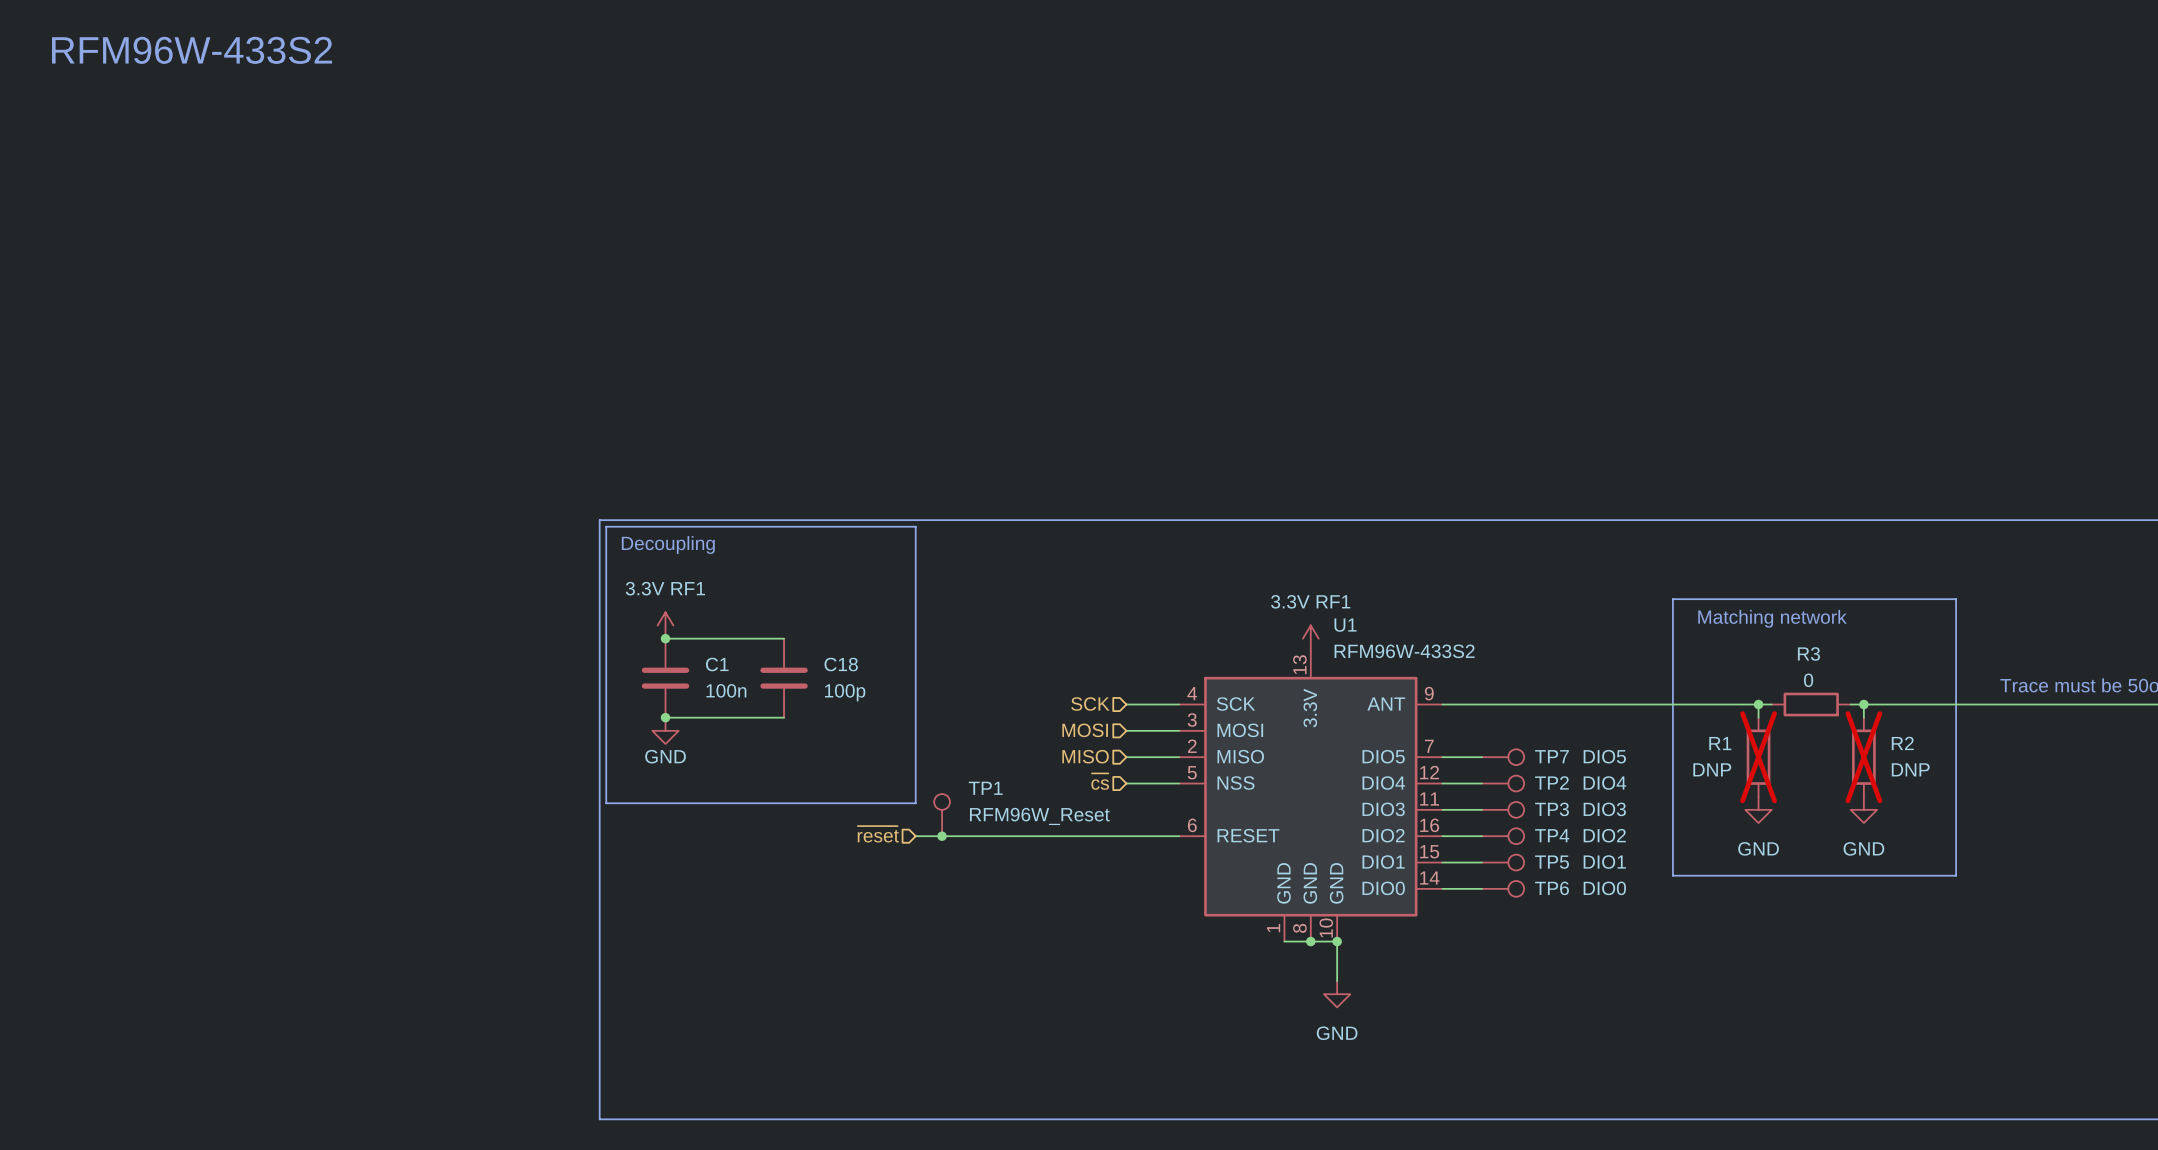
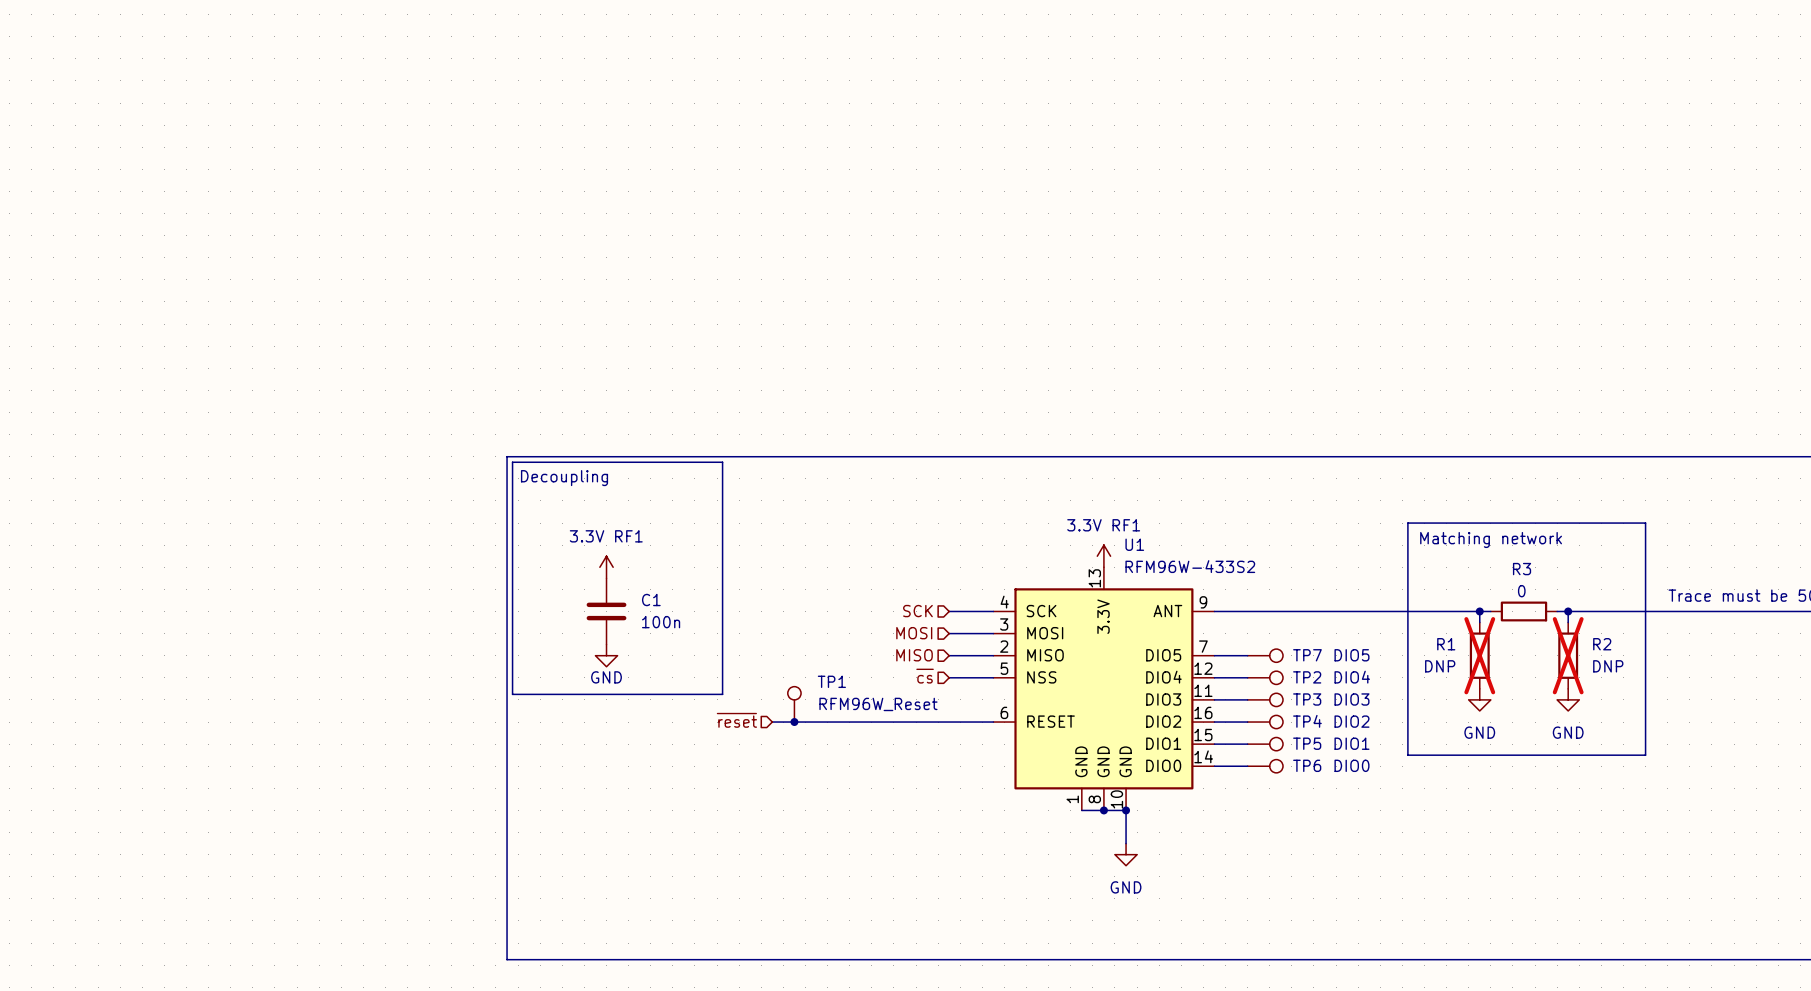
text: RFM96W-433S2 (192, 50) -> none
line: (856, 526) (915, 526) (915, 803) (856, 803) -> (722, 462) (722, 694)
power symbol position: 3.3V RF1 (665, 625) -> 3.3V RF1 (606, 567)
wire: (665, 638) (784, 638) -> none
junction: (665, 638) -> none
C1 position: (665, 678) -> (606, 611)
C18: 100p (784, 678) -> none
wire: (665, 717) (784, 717) -> none
junction: (665, 717) -> none
power symbol position: GND (665, 730) -> GND (606, 655)

